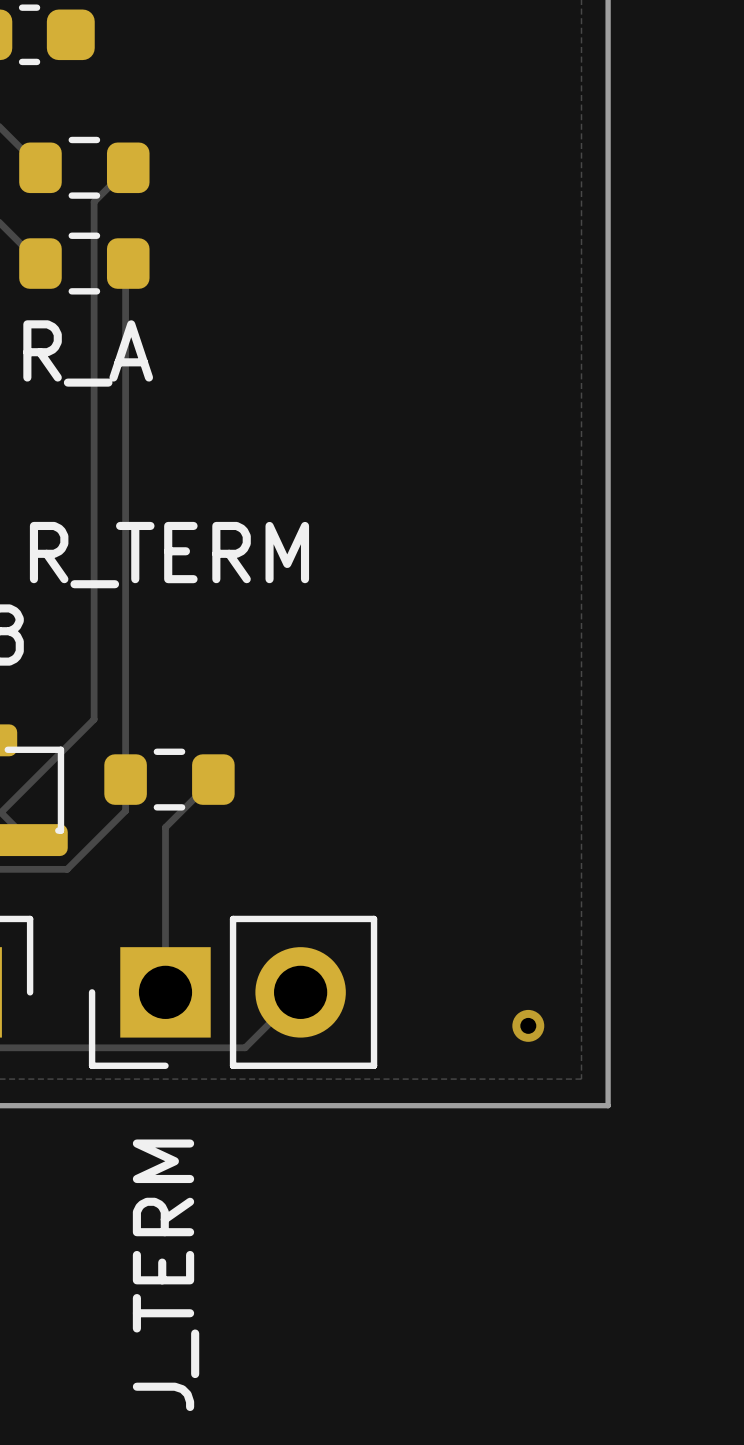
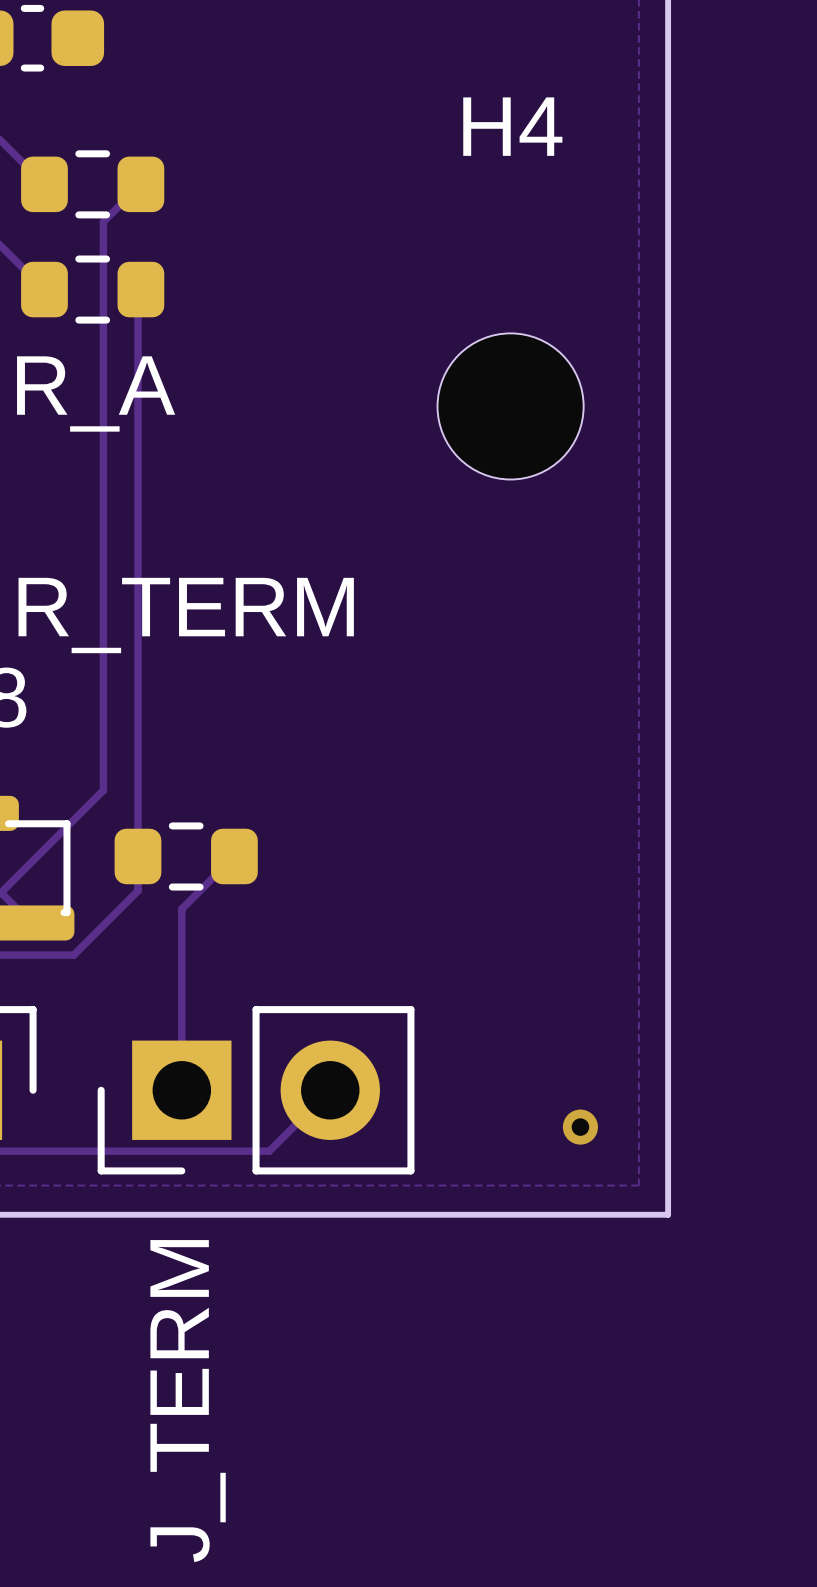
H4: none -> (510, 406)

